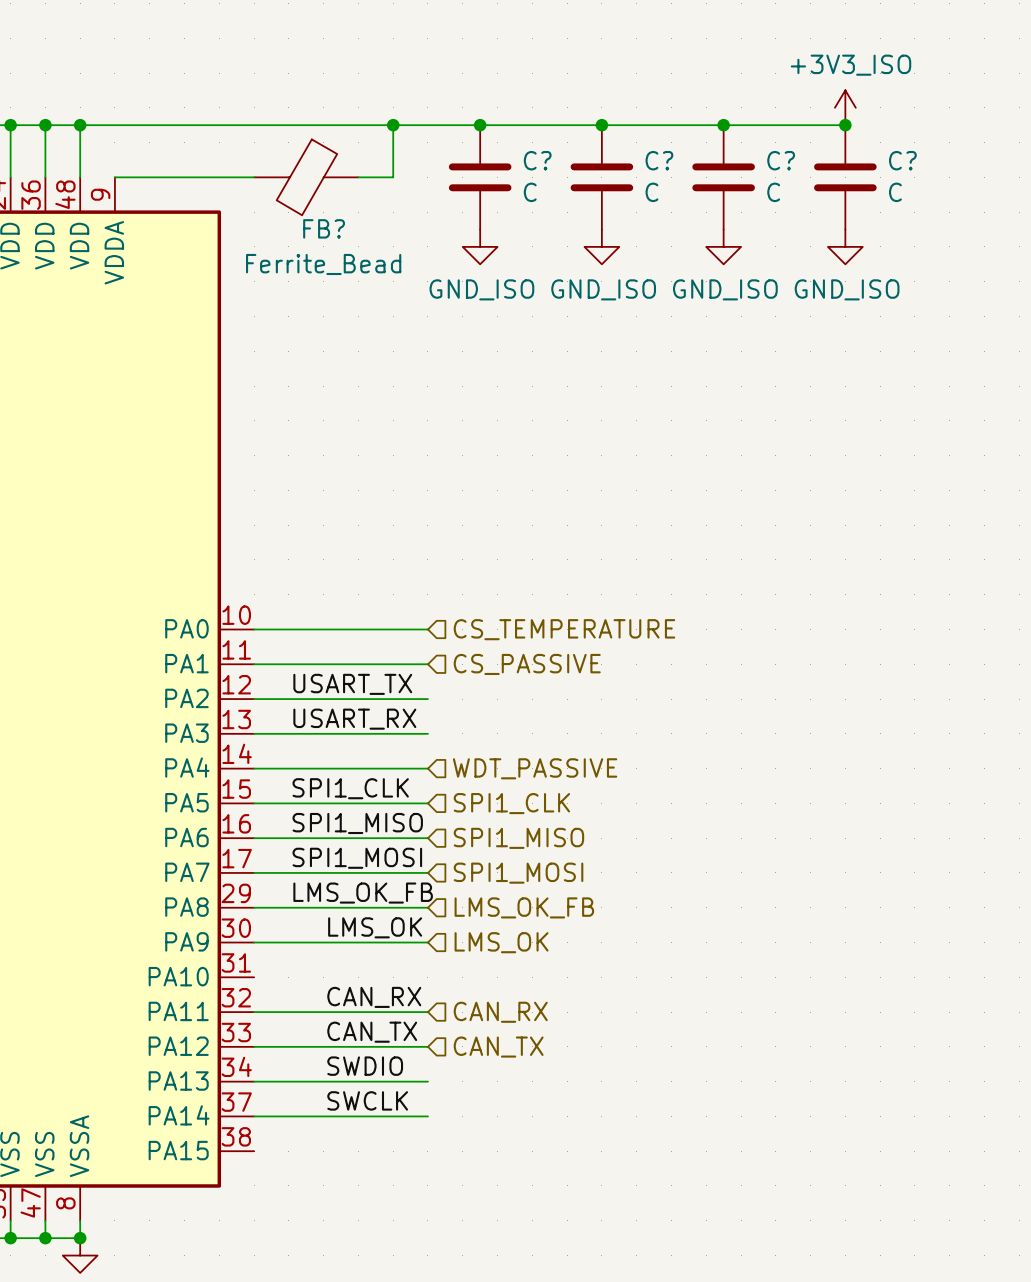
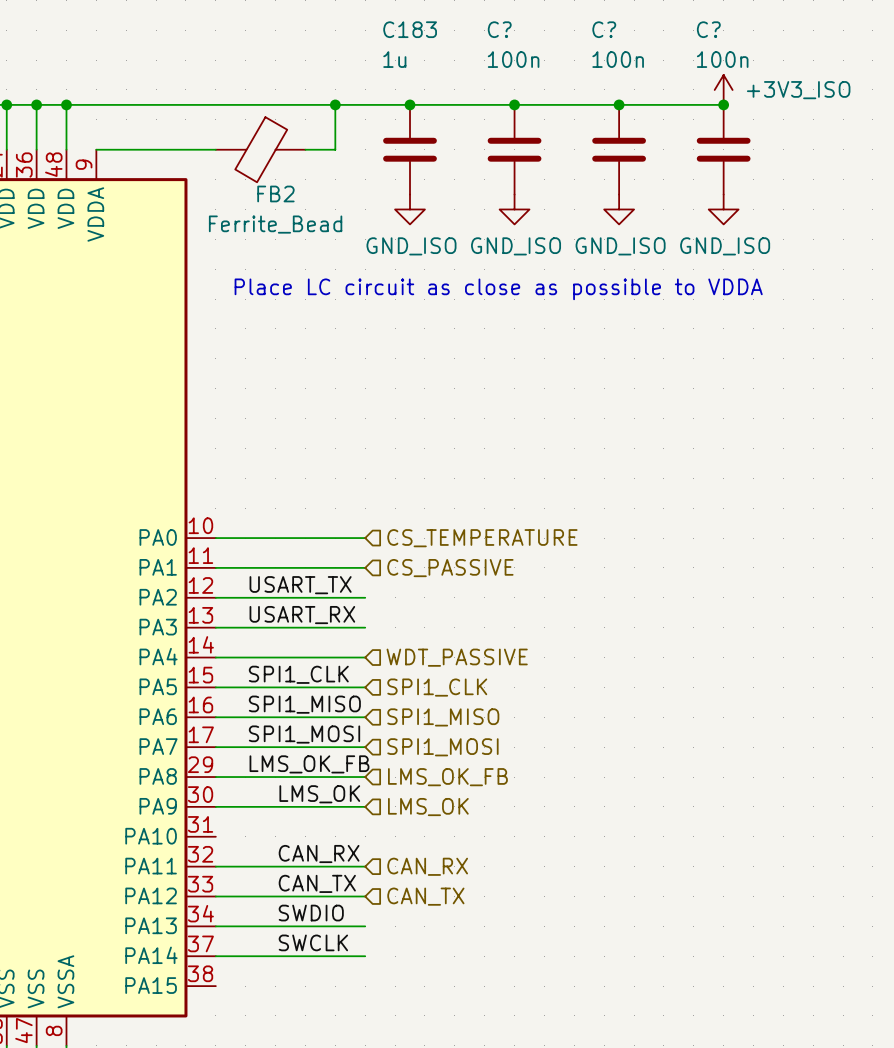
power symbol text position: +3V3_ISO (850, 65) -> +3V3_ISO (798, 90)
C? name: C? (537, 160) -> C183 (410, 29)
C? name position: C? (659, 160) -> C? (499, 29)
C? name position: C? (781, 160) -> C? (604, 29)
C? name position: C? (902, 160) -> C? (708, 29)
C? value: C (530, 192) -> 1u (394, 59)
C? value: C (651, 192) -> 100n (513, 59)
C? value: C (773, 192) -> 100n (618, 59)
C? value: C (895, 192) -> 100n (722, 59)
FB? name: FB? (324, 228) -> FB2 (275, 193)
text: none -> Place LC circuit as close as possible to VDDA (498, 289)

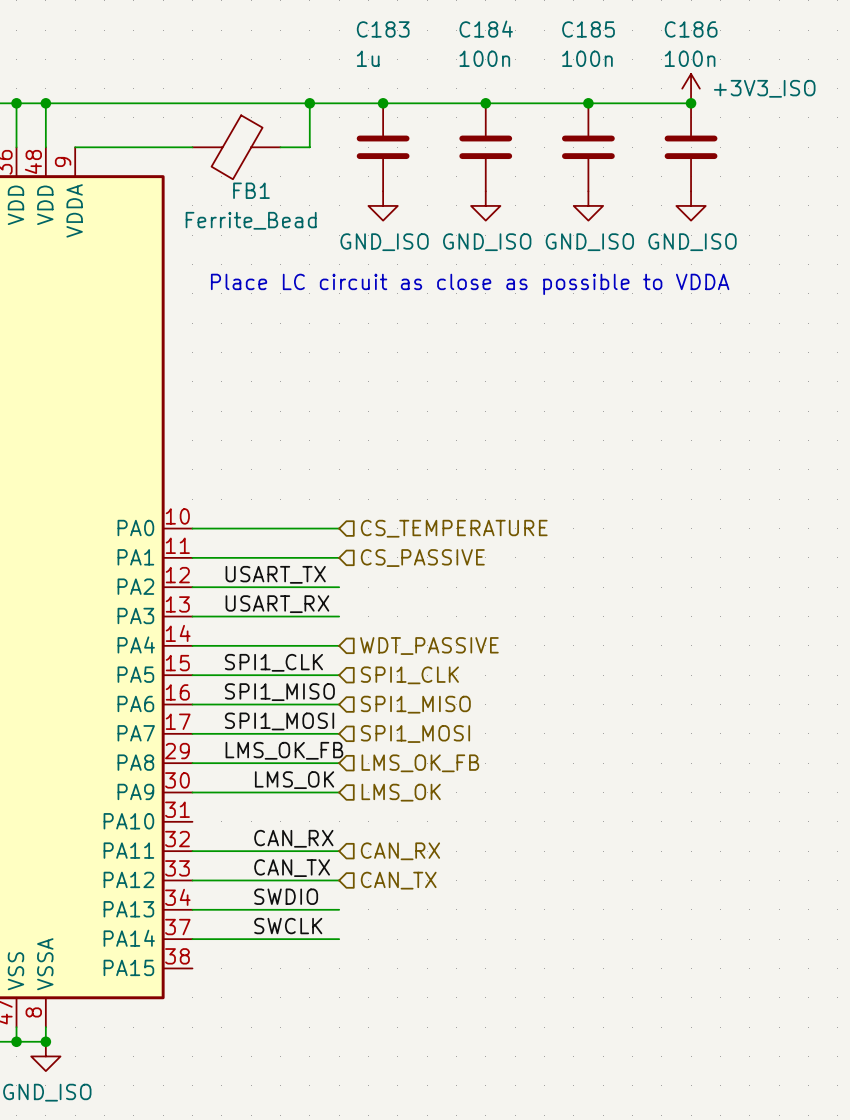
C? name: C? (499, 29) -> C184 (486, 29)
C? name: C? (604, 29) -> C185 (588, 29)
C? name: C? (708, 29) -> C186 (691, 29)
FB2 name: FB2 (275, 193) -> FB1 (251, 190)

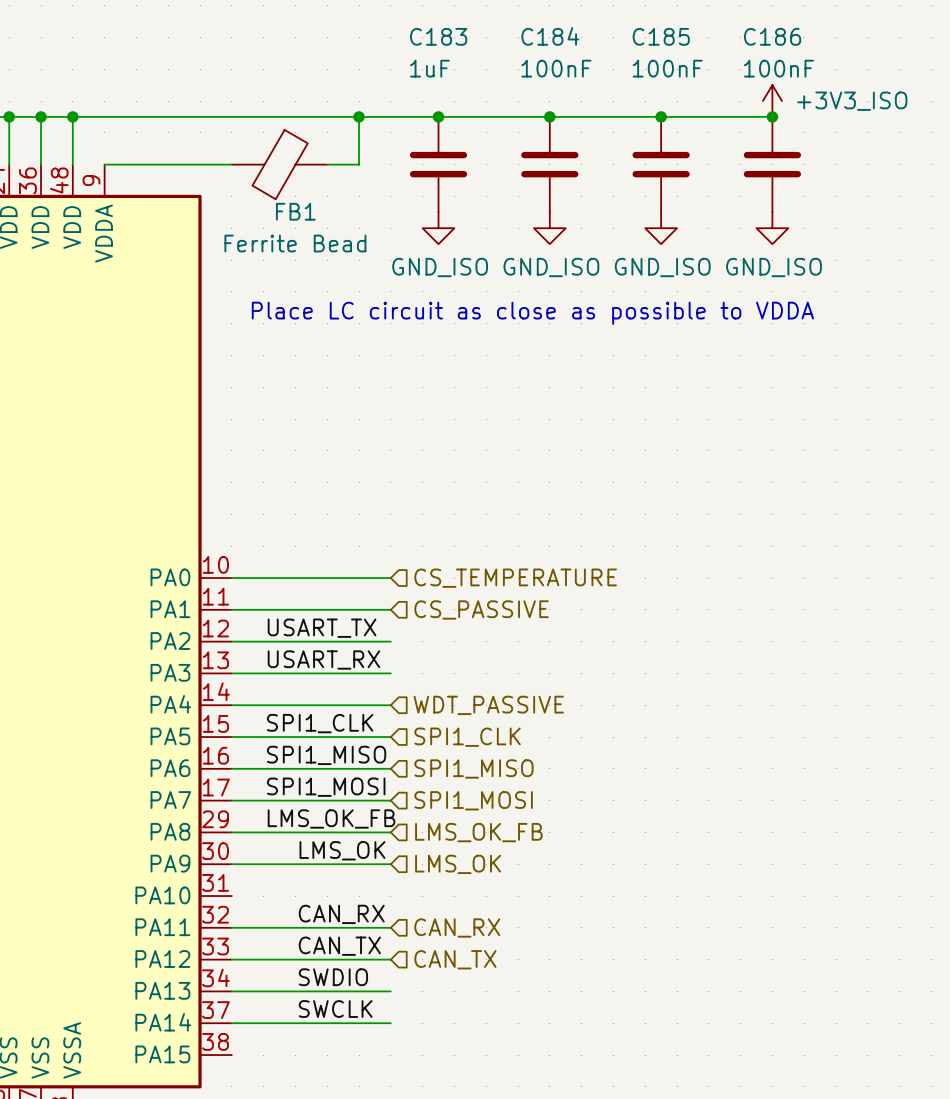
C183 value: 1u (368, 58) -> 1uF (429, 68)
C184 value: 100n (484, 58) -> 100nF (556, 68)
C185 value: 100n (587, 58) -> 100nF (667, 68)
C186 value: 100n (690, 58) -> 100nF (778, 68)
FB1 value: Ferrite_Bead (251, 220) -> Ferrite Bead (295, 243)

